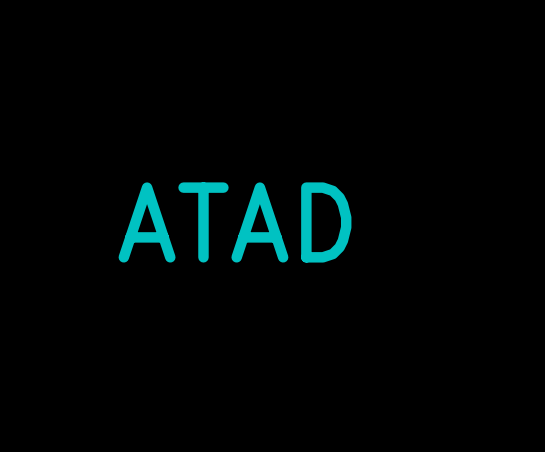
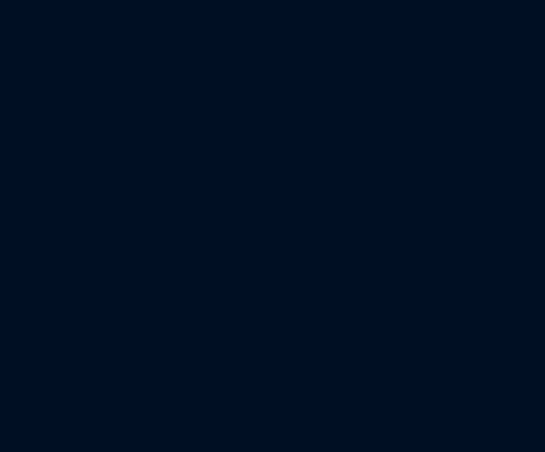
text: ATAD (235, 222) -> none

